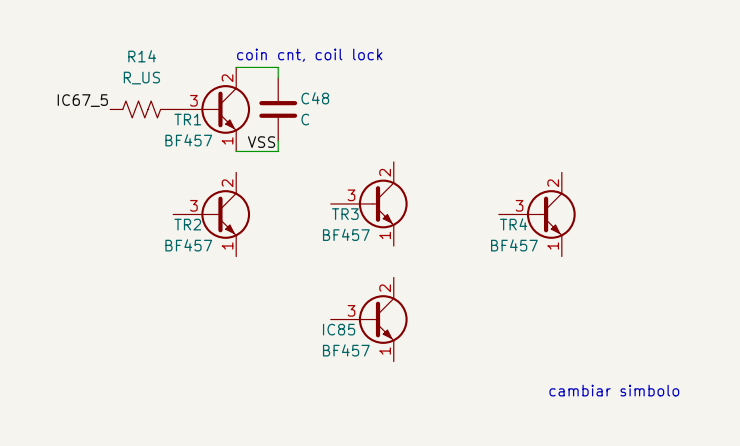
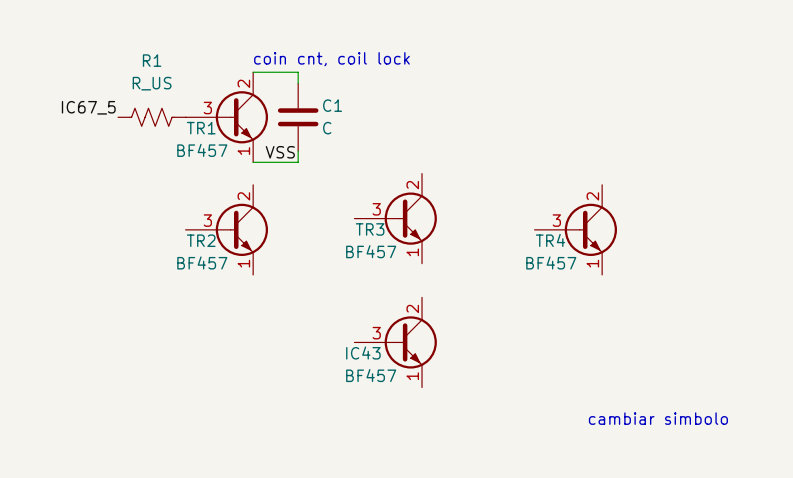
R14 name: R14 (142, 56) -> R1 (152, 60)
C48 name: C48 (315, 98) -> C1 (332, 105)
IC85 name: IC85 (339, 329) -> IC43 (363, 353)

